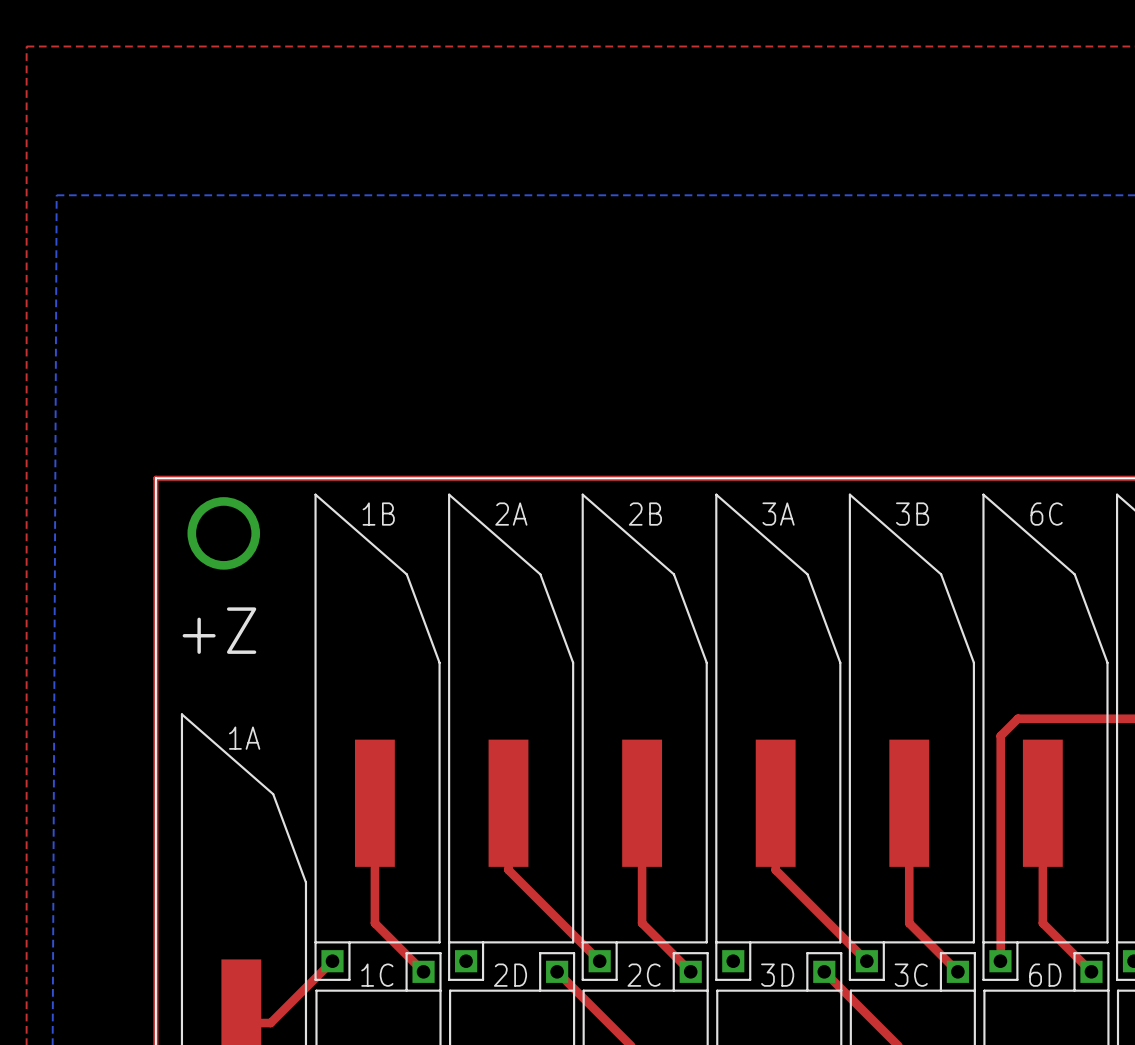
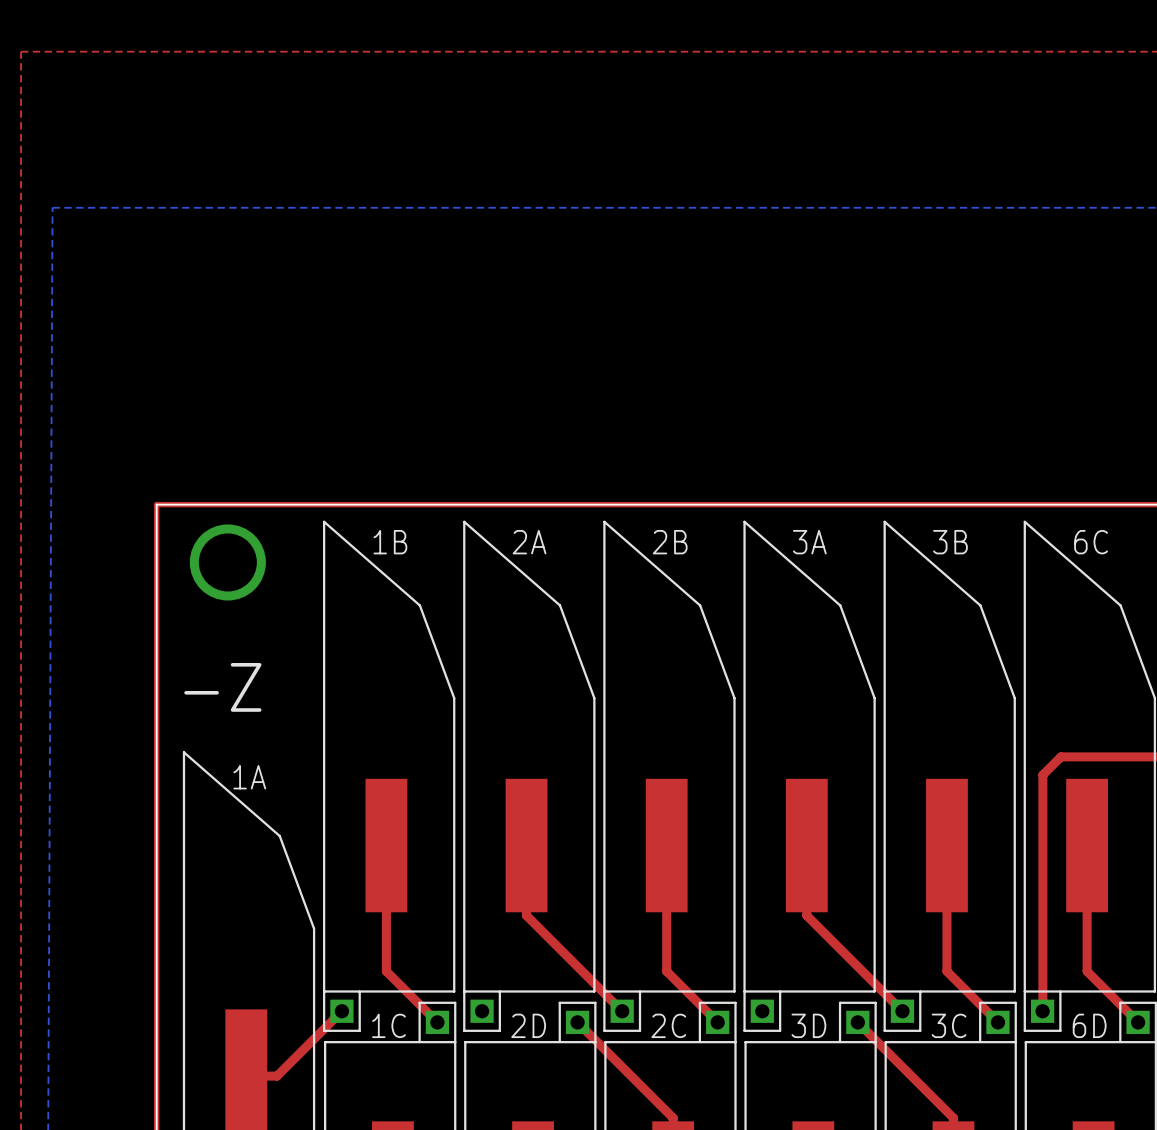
text: +Z (219, 630) -> none
text: none -> -Z (222, 687)

